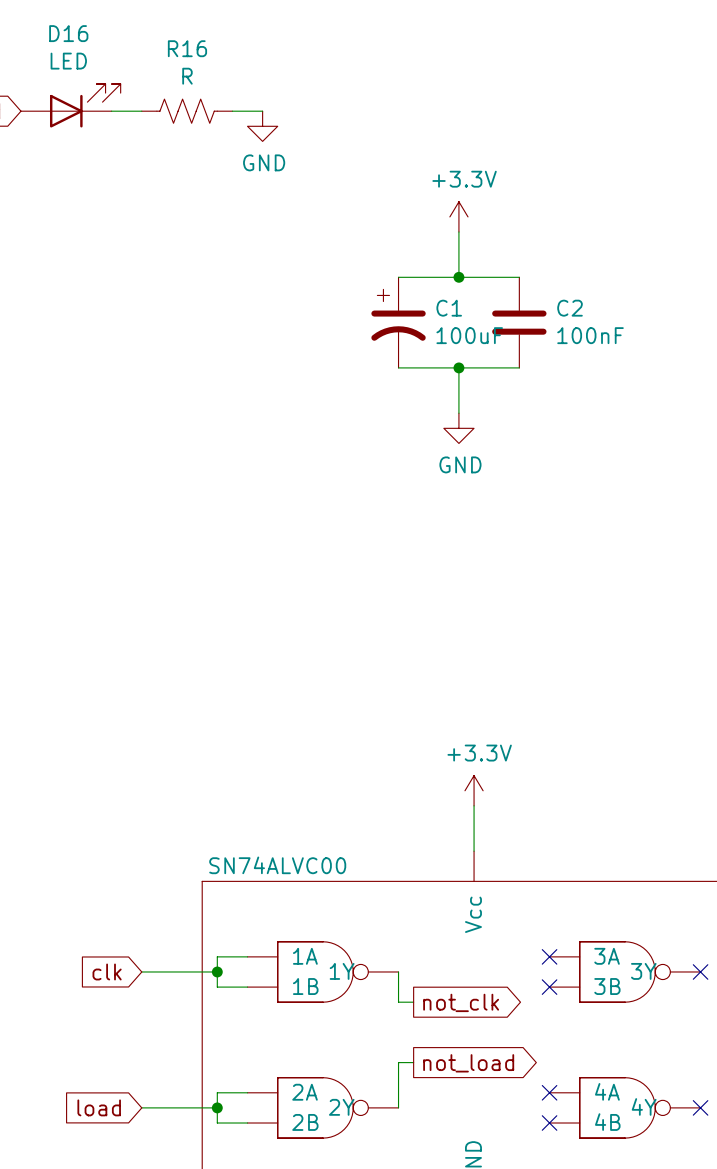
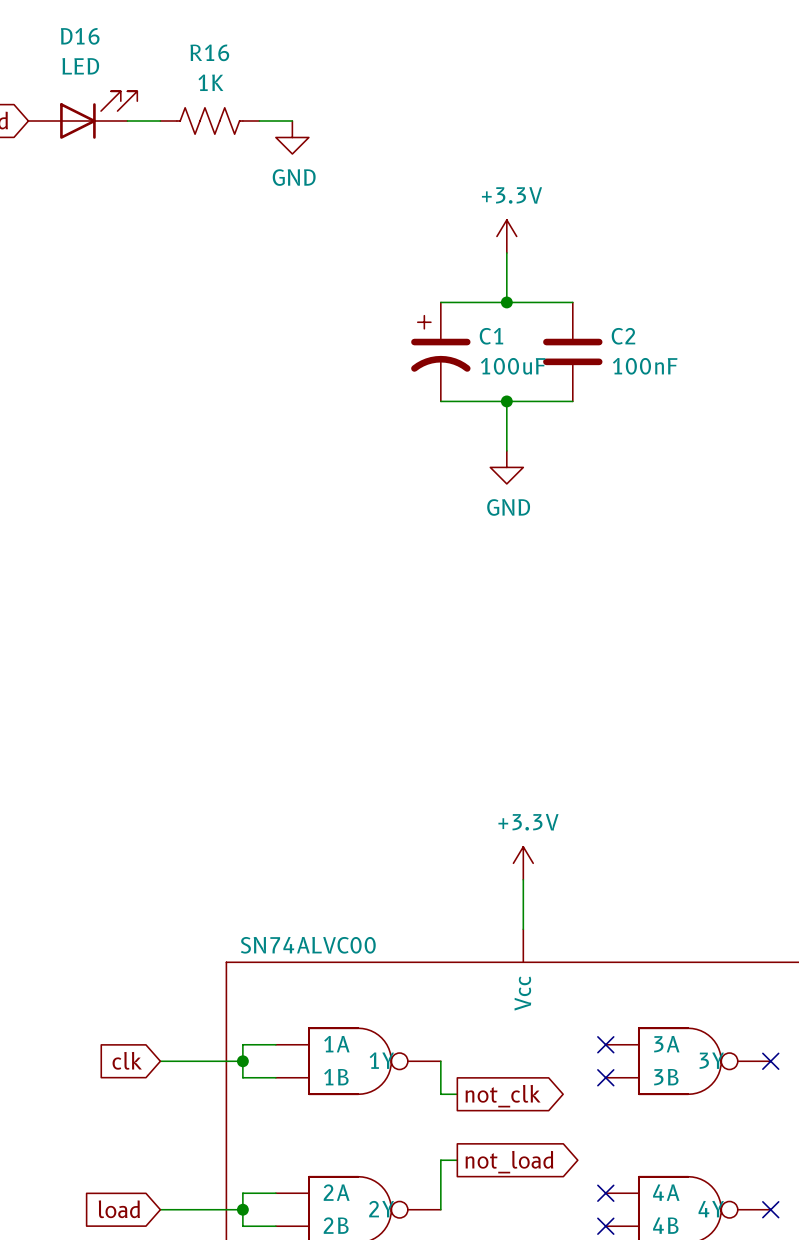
R16 value: R (187, 76) -> 1K (210, 82)

